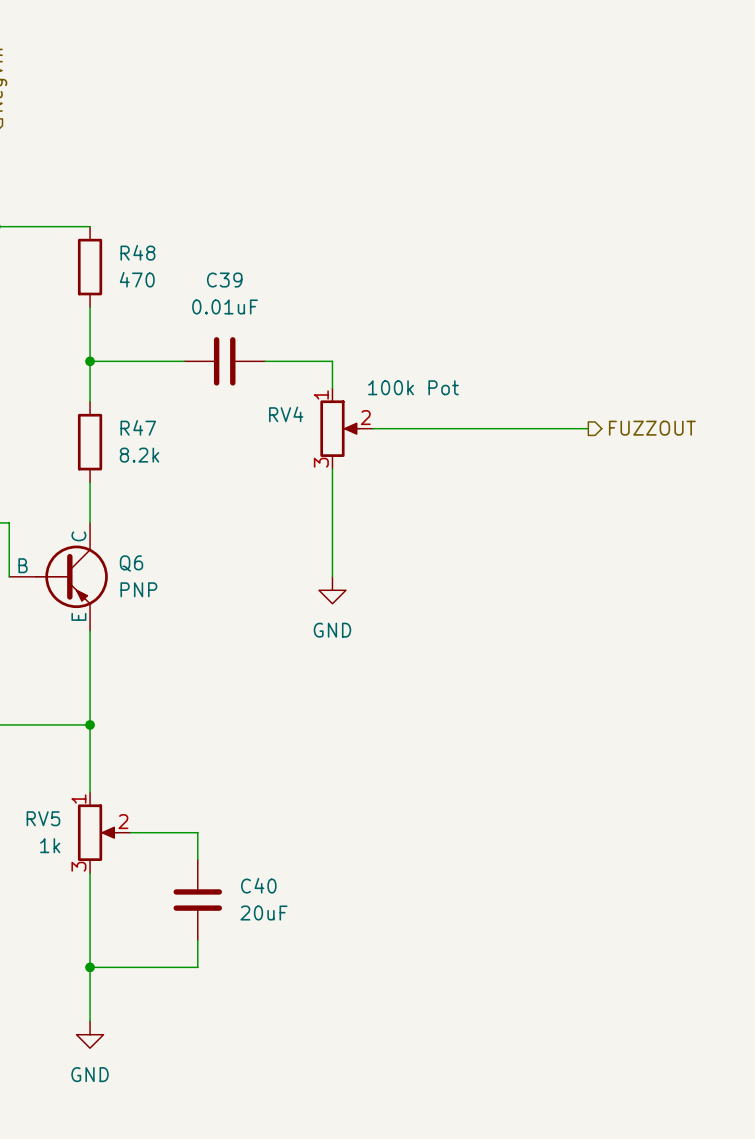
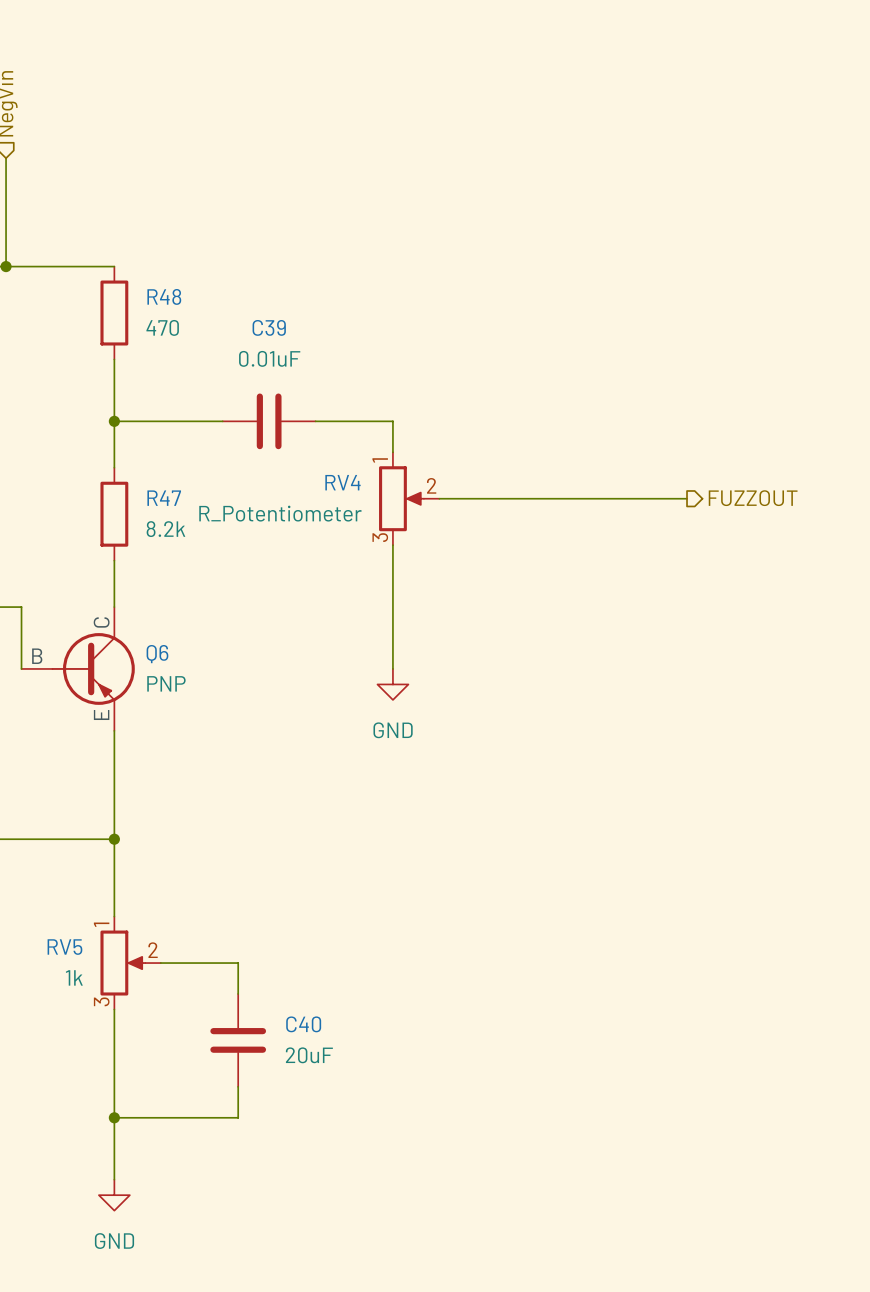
RV4 value: 100k Pot (413, 387) -> R_Potentiometer (280, 513)

